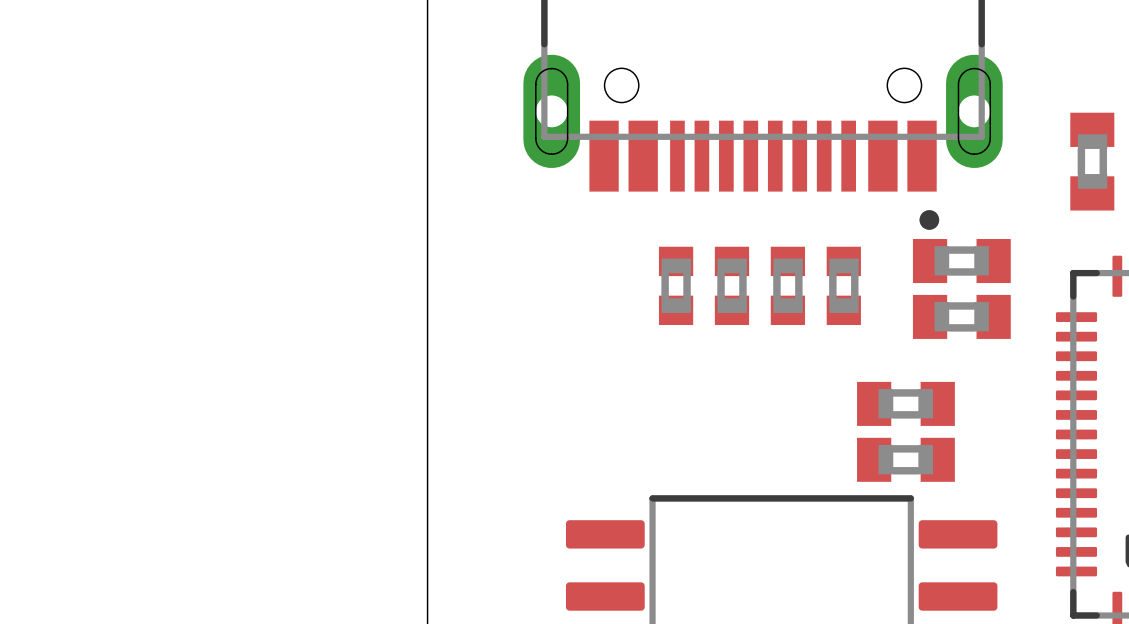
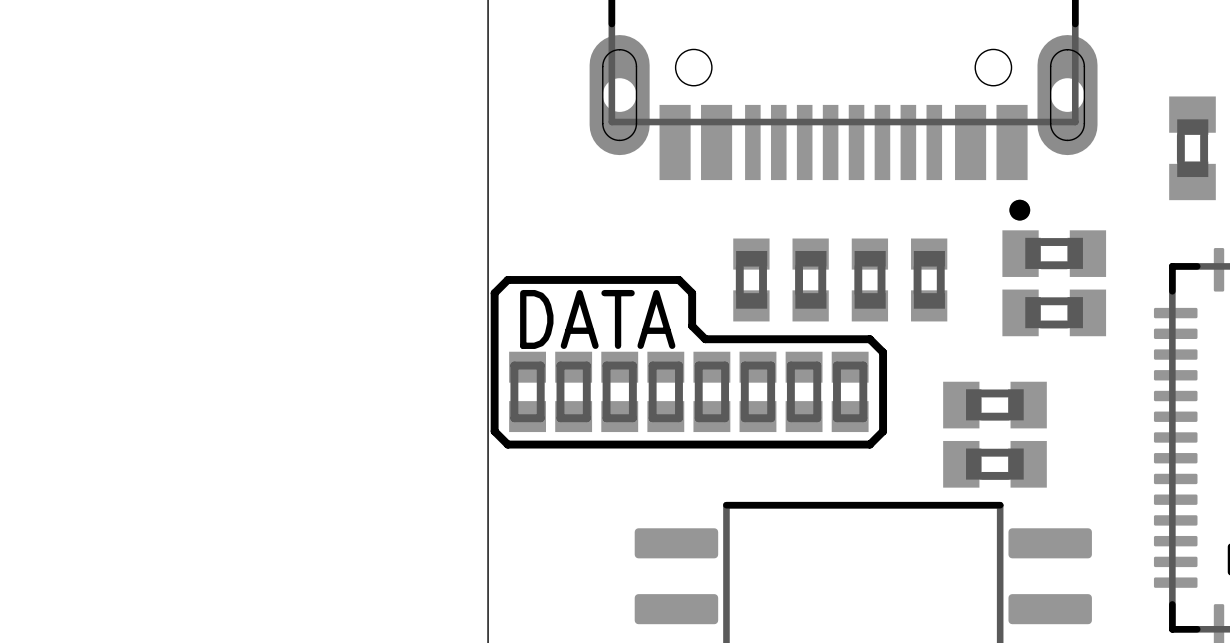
line: none -> (507, 279) (678, 279) (692, 293) (692, 326) (705, 339) (869, 339) (883, 352) (883, 431) (869, 444) (507, 444) (494, 431) (494, 293) (507, 279)
text: none -> DATA (597, 319)
part: none -> (527, 391)
part: none -> (573, 391)
part: none -> (619, 391)
part: none -> (665, 391)
part: none -> (711, 391)
part: none -> (757, 391)
part: none -> (804, 391)
part: none -> (850, 391)

